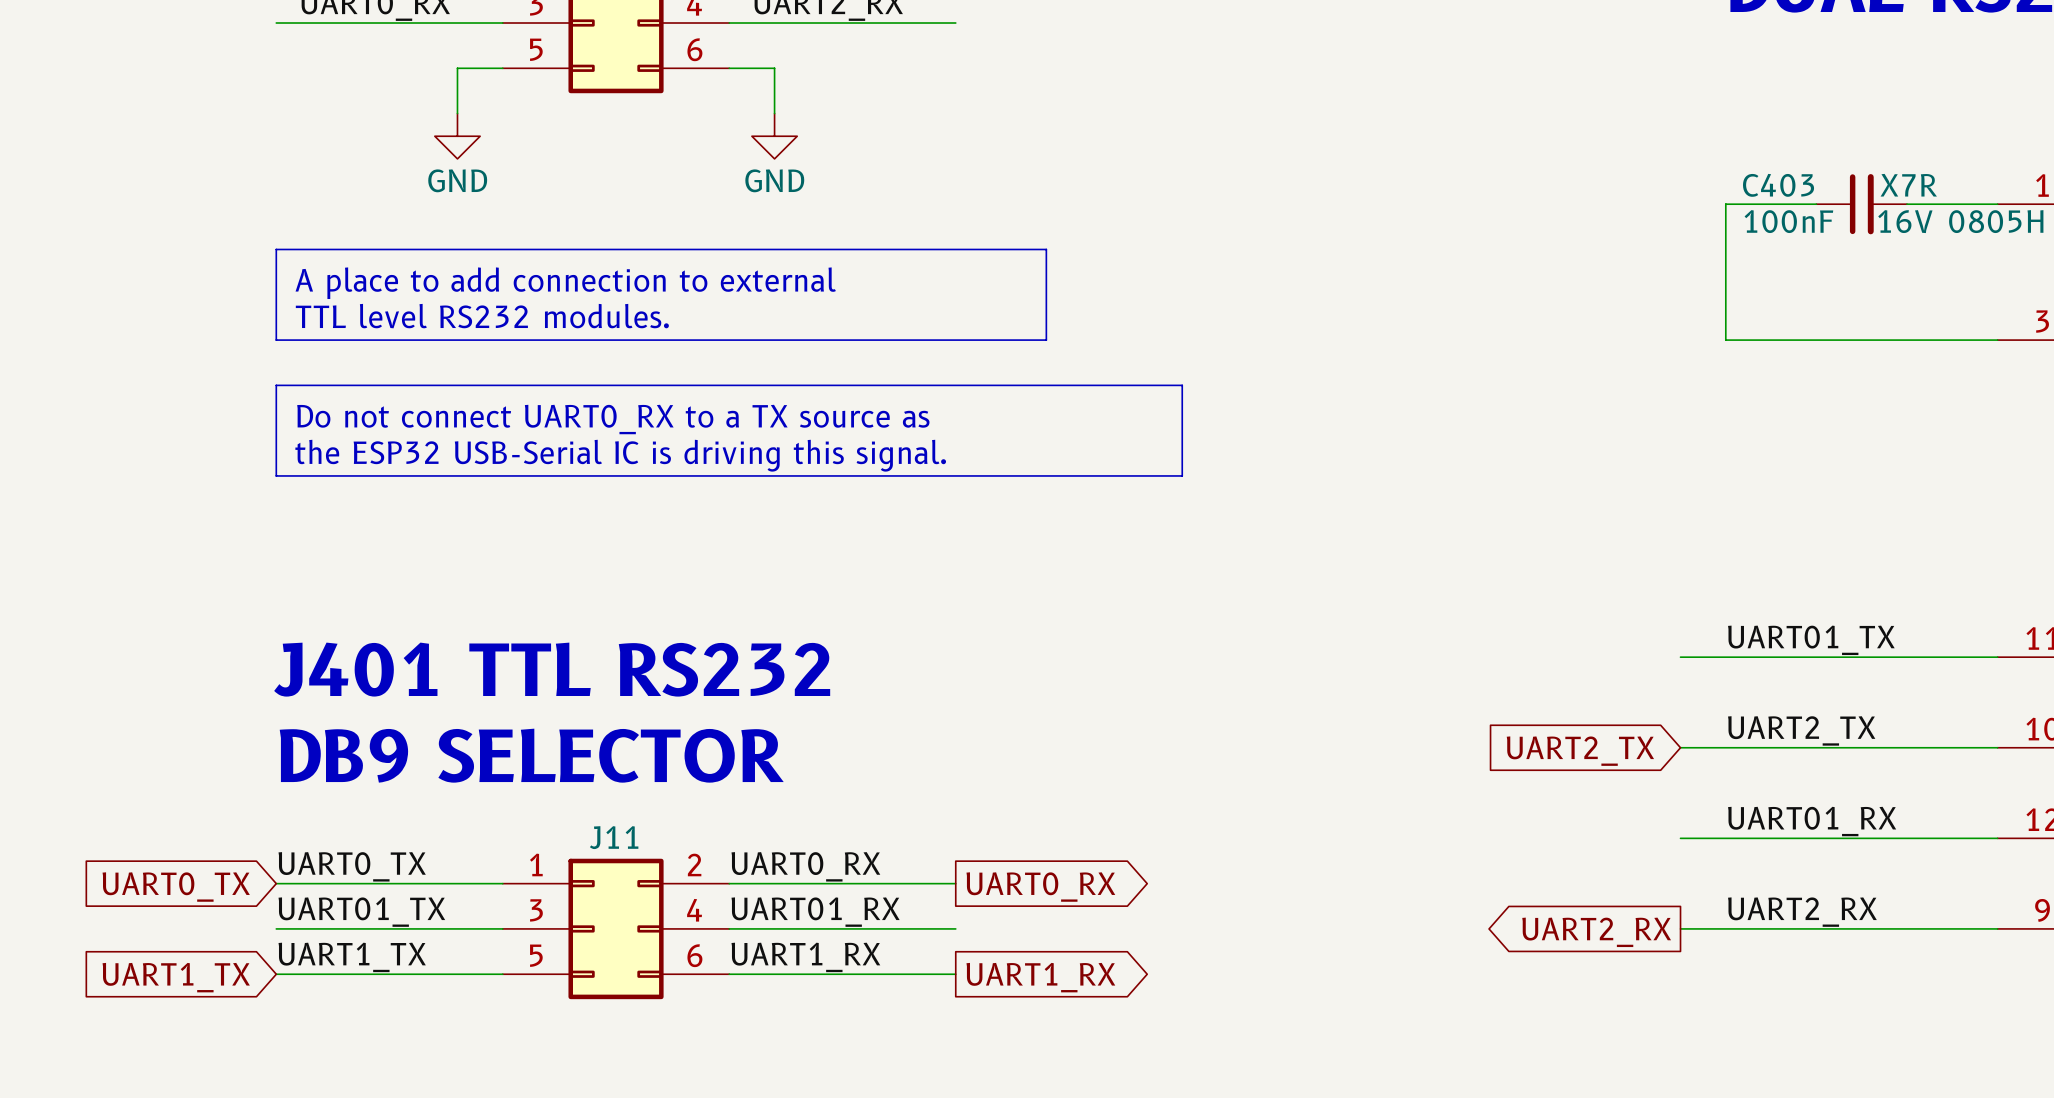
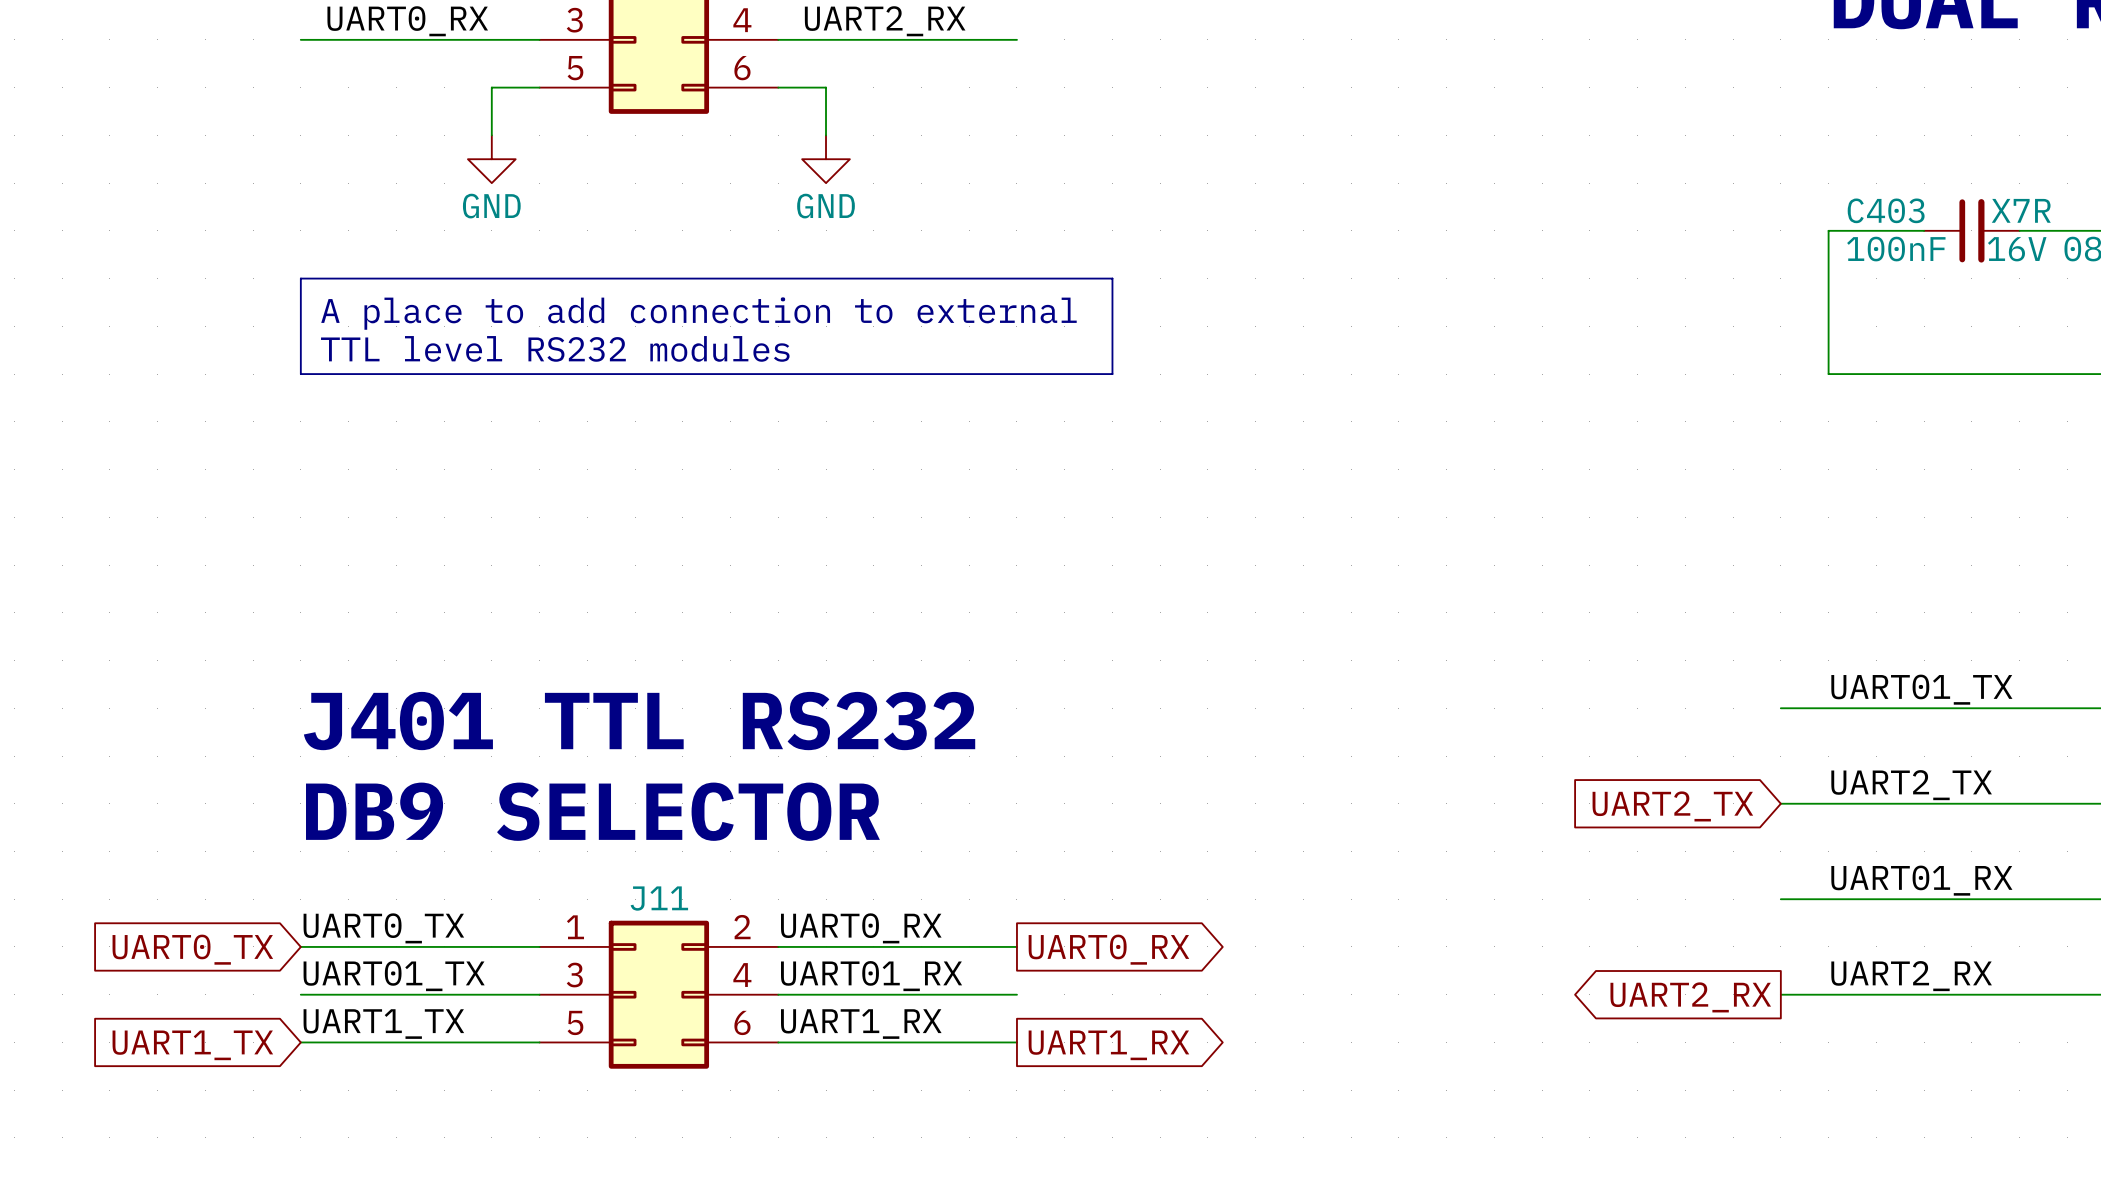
text: TTL level RS232 modules. (482, 316) -> TTL level RS232 modules (555, 348)
line: (276, 385) (1182, 385) (1182, 475) (276, 475) (276, 385) -> none
text: Do not connect UART0_RX to a TX source as (613, 419) -> none
text: the ESP32 USB-Serial IC is driving this signal. (620, 455) -> none

